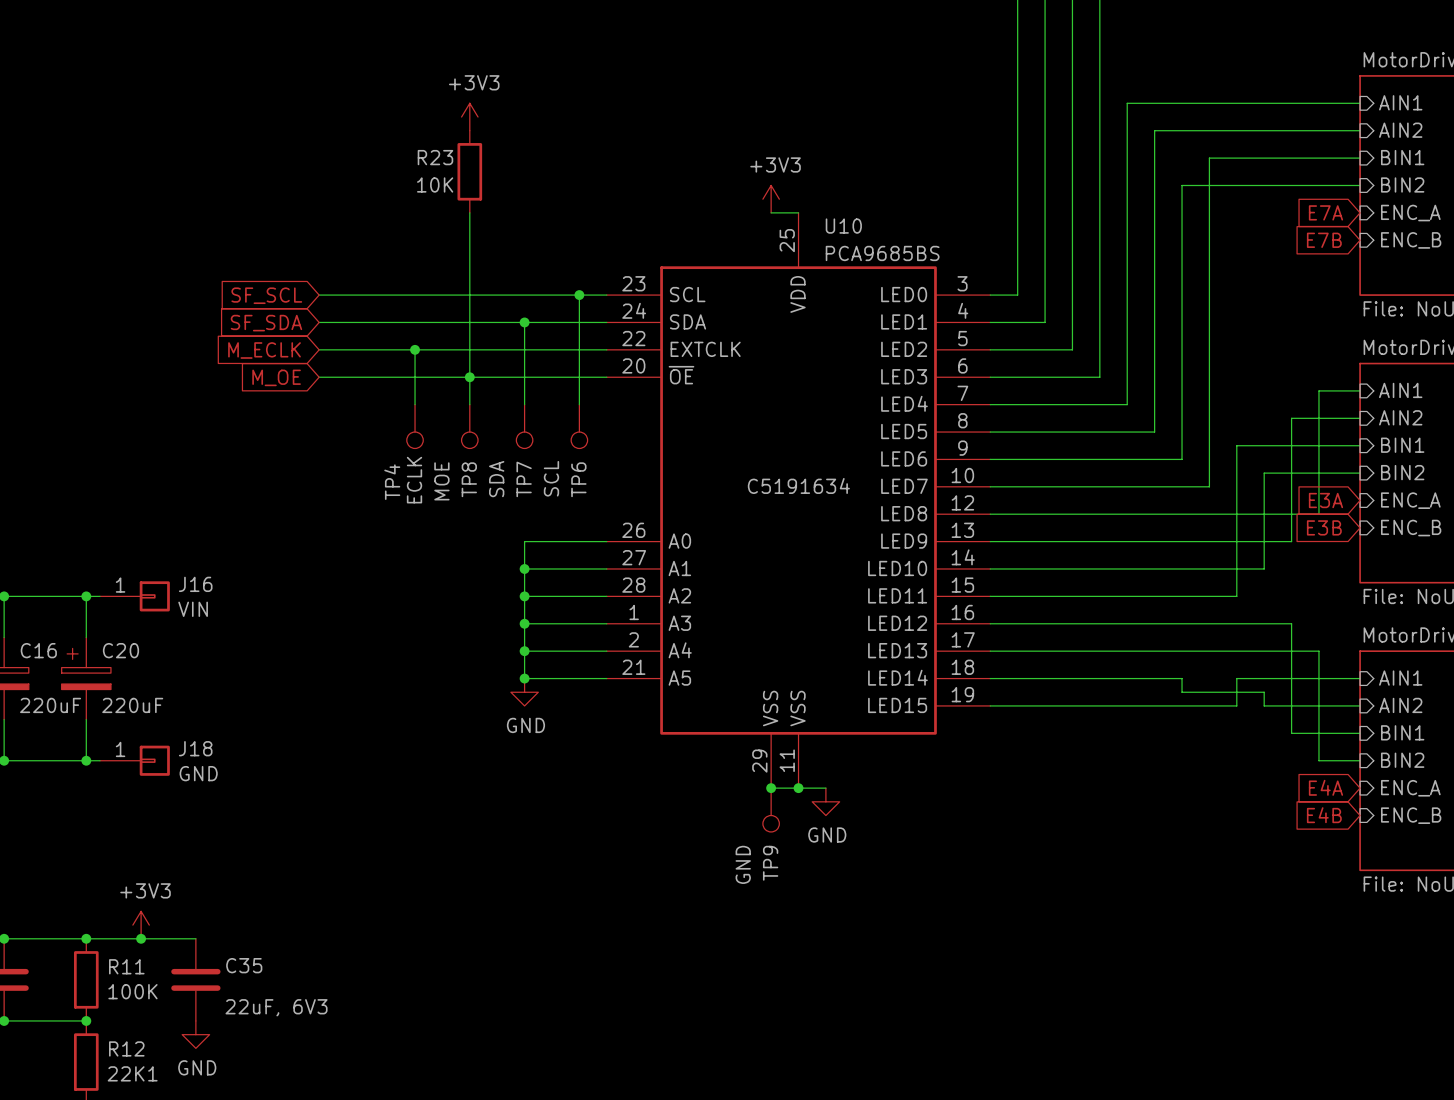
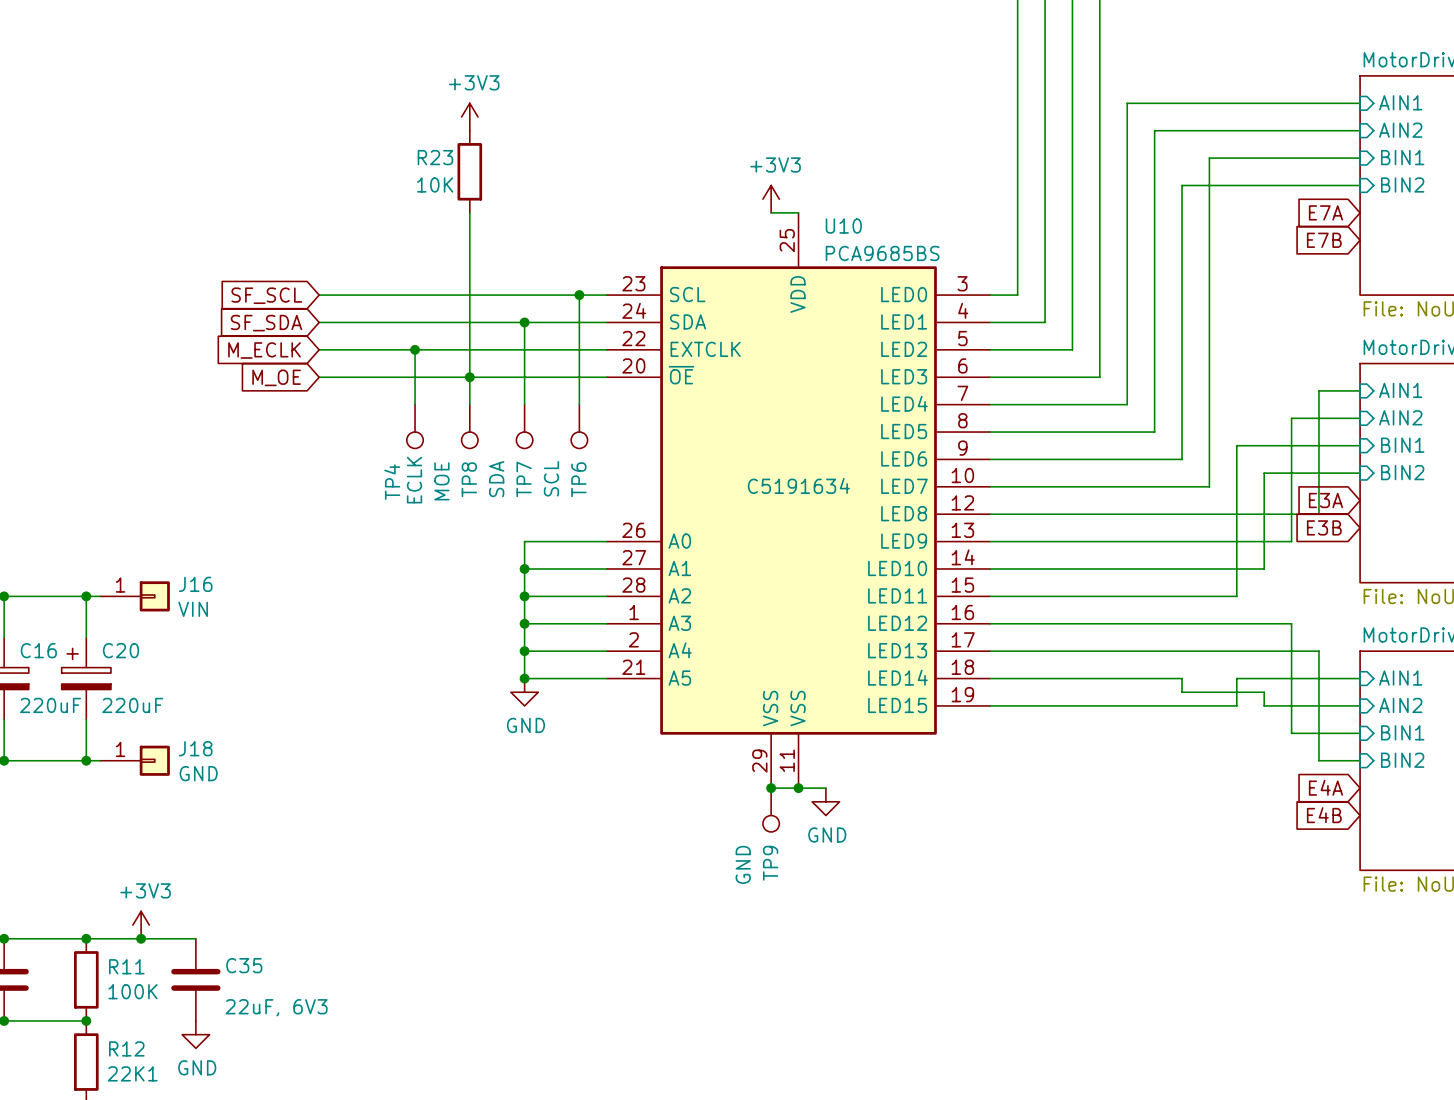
sheet pin: ENC_A (1410, 213) -> none
sheet pin: ENC_B (1411, 240) -> none
sheet pin: ENC_A (1410, 500) -> none
sheet pin: ENC_B (1411, 528) -> none
sheet pin: ENC_A (1410, 788) -> none
sheet pin: ENC_B (1411, 815) -> none

